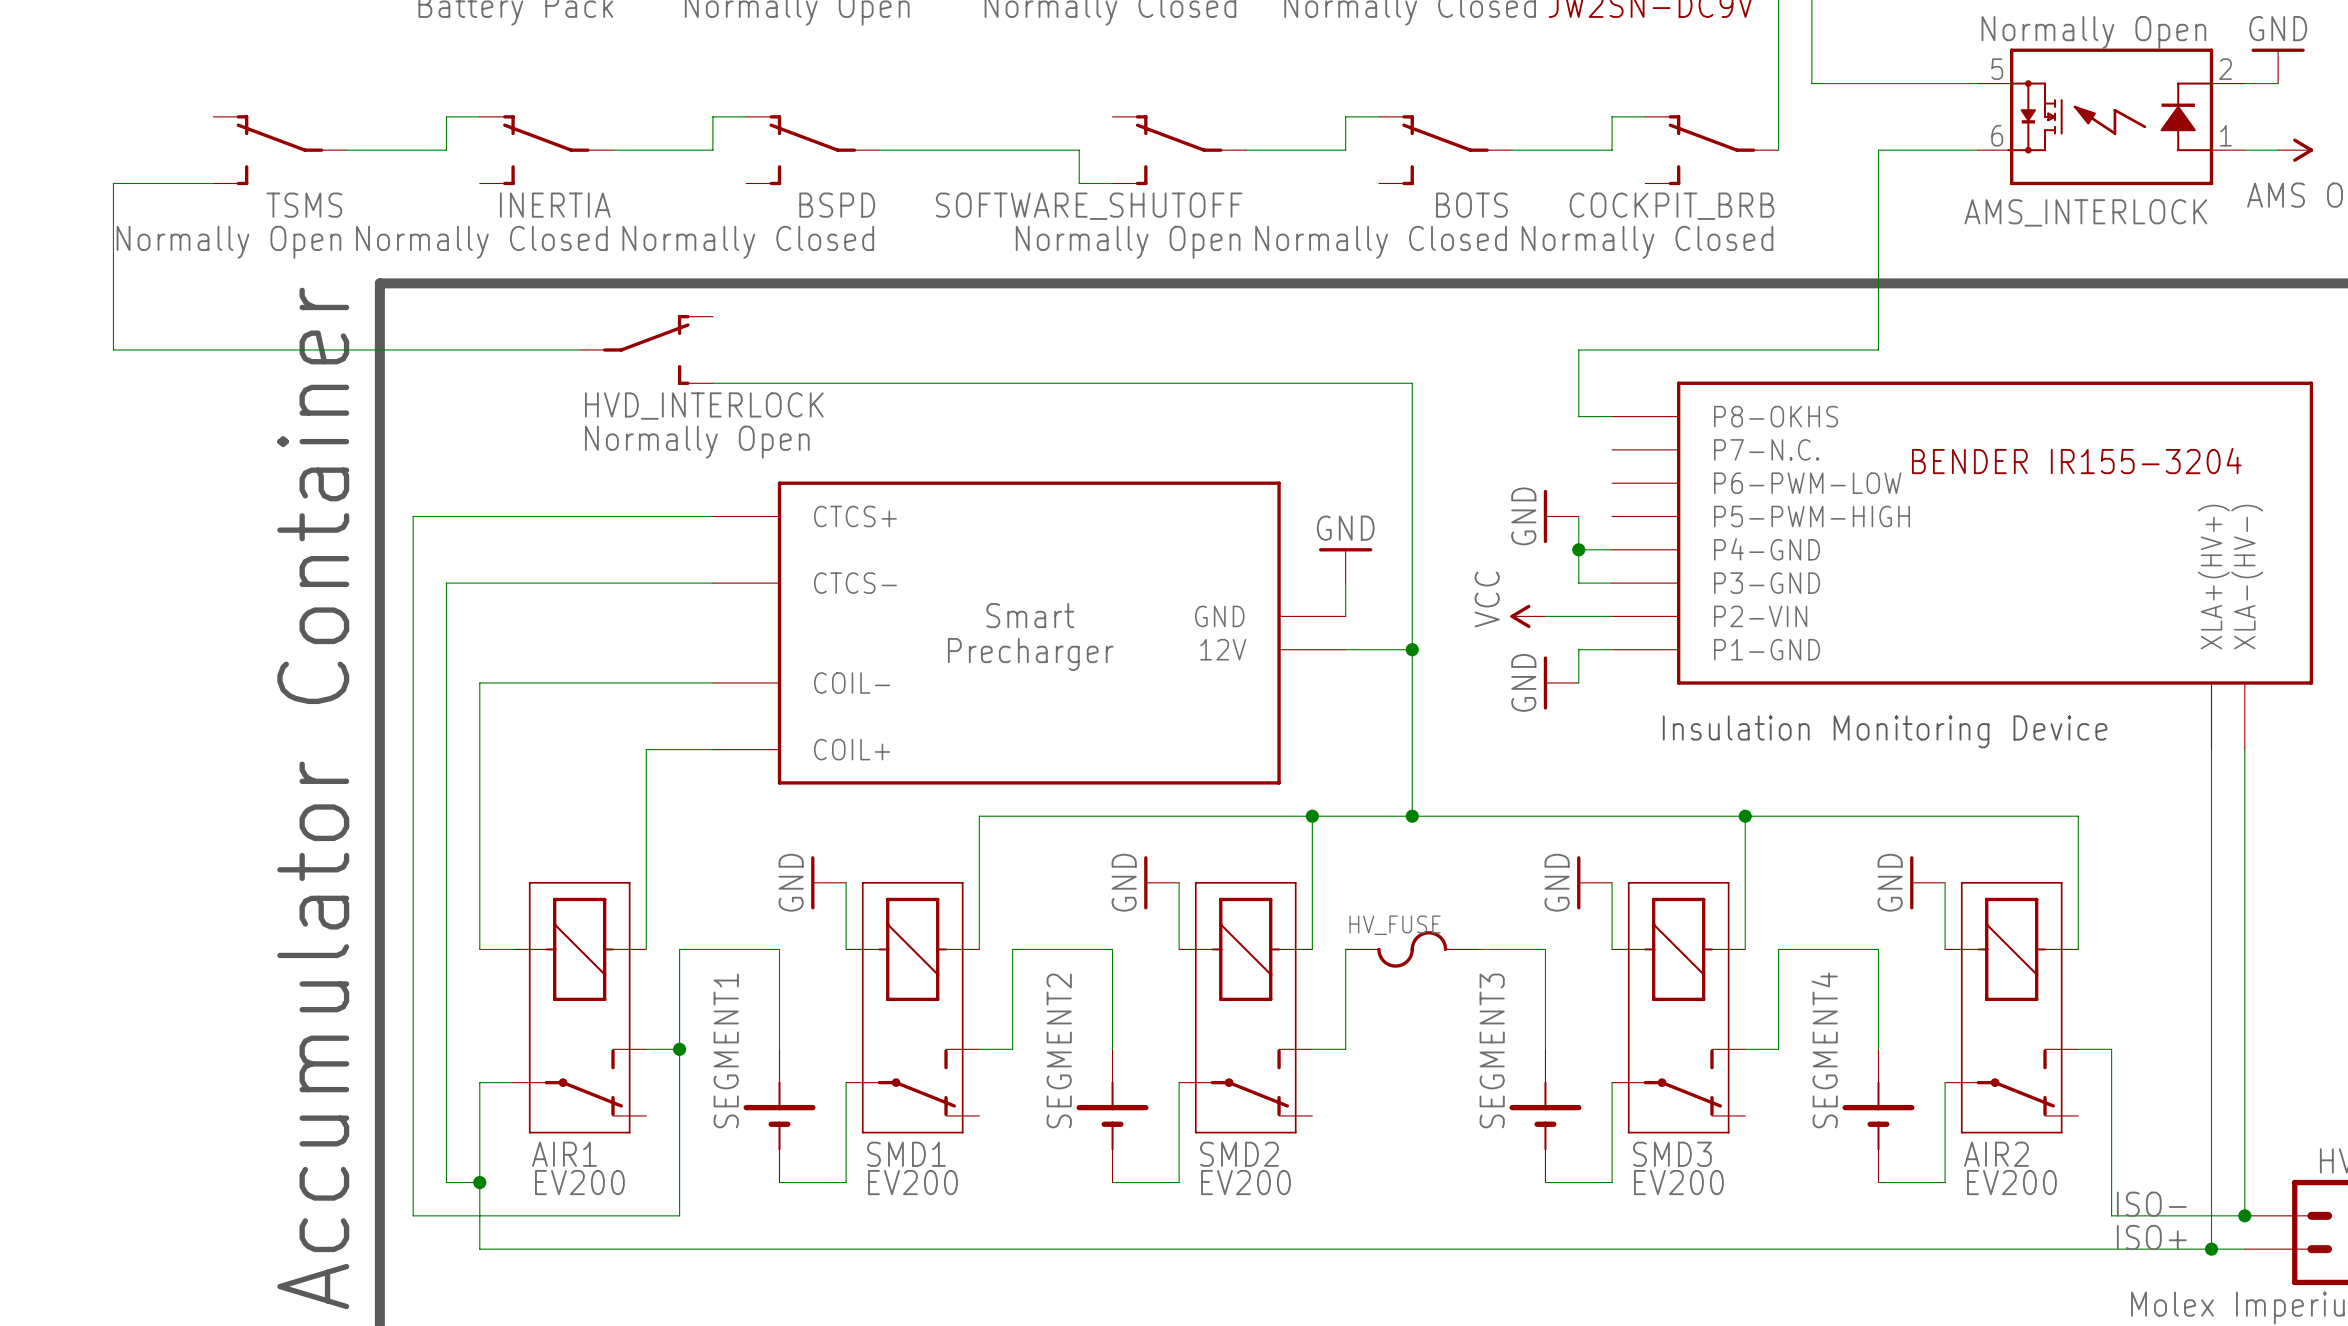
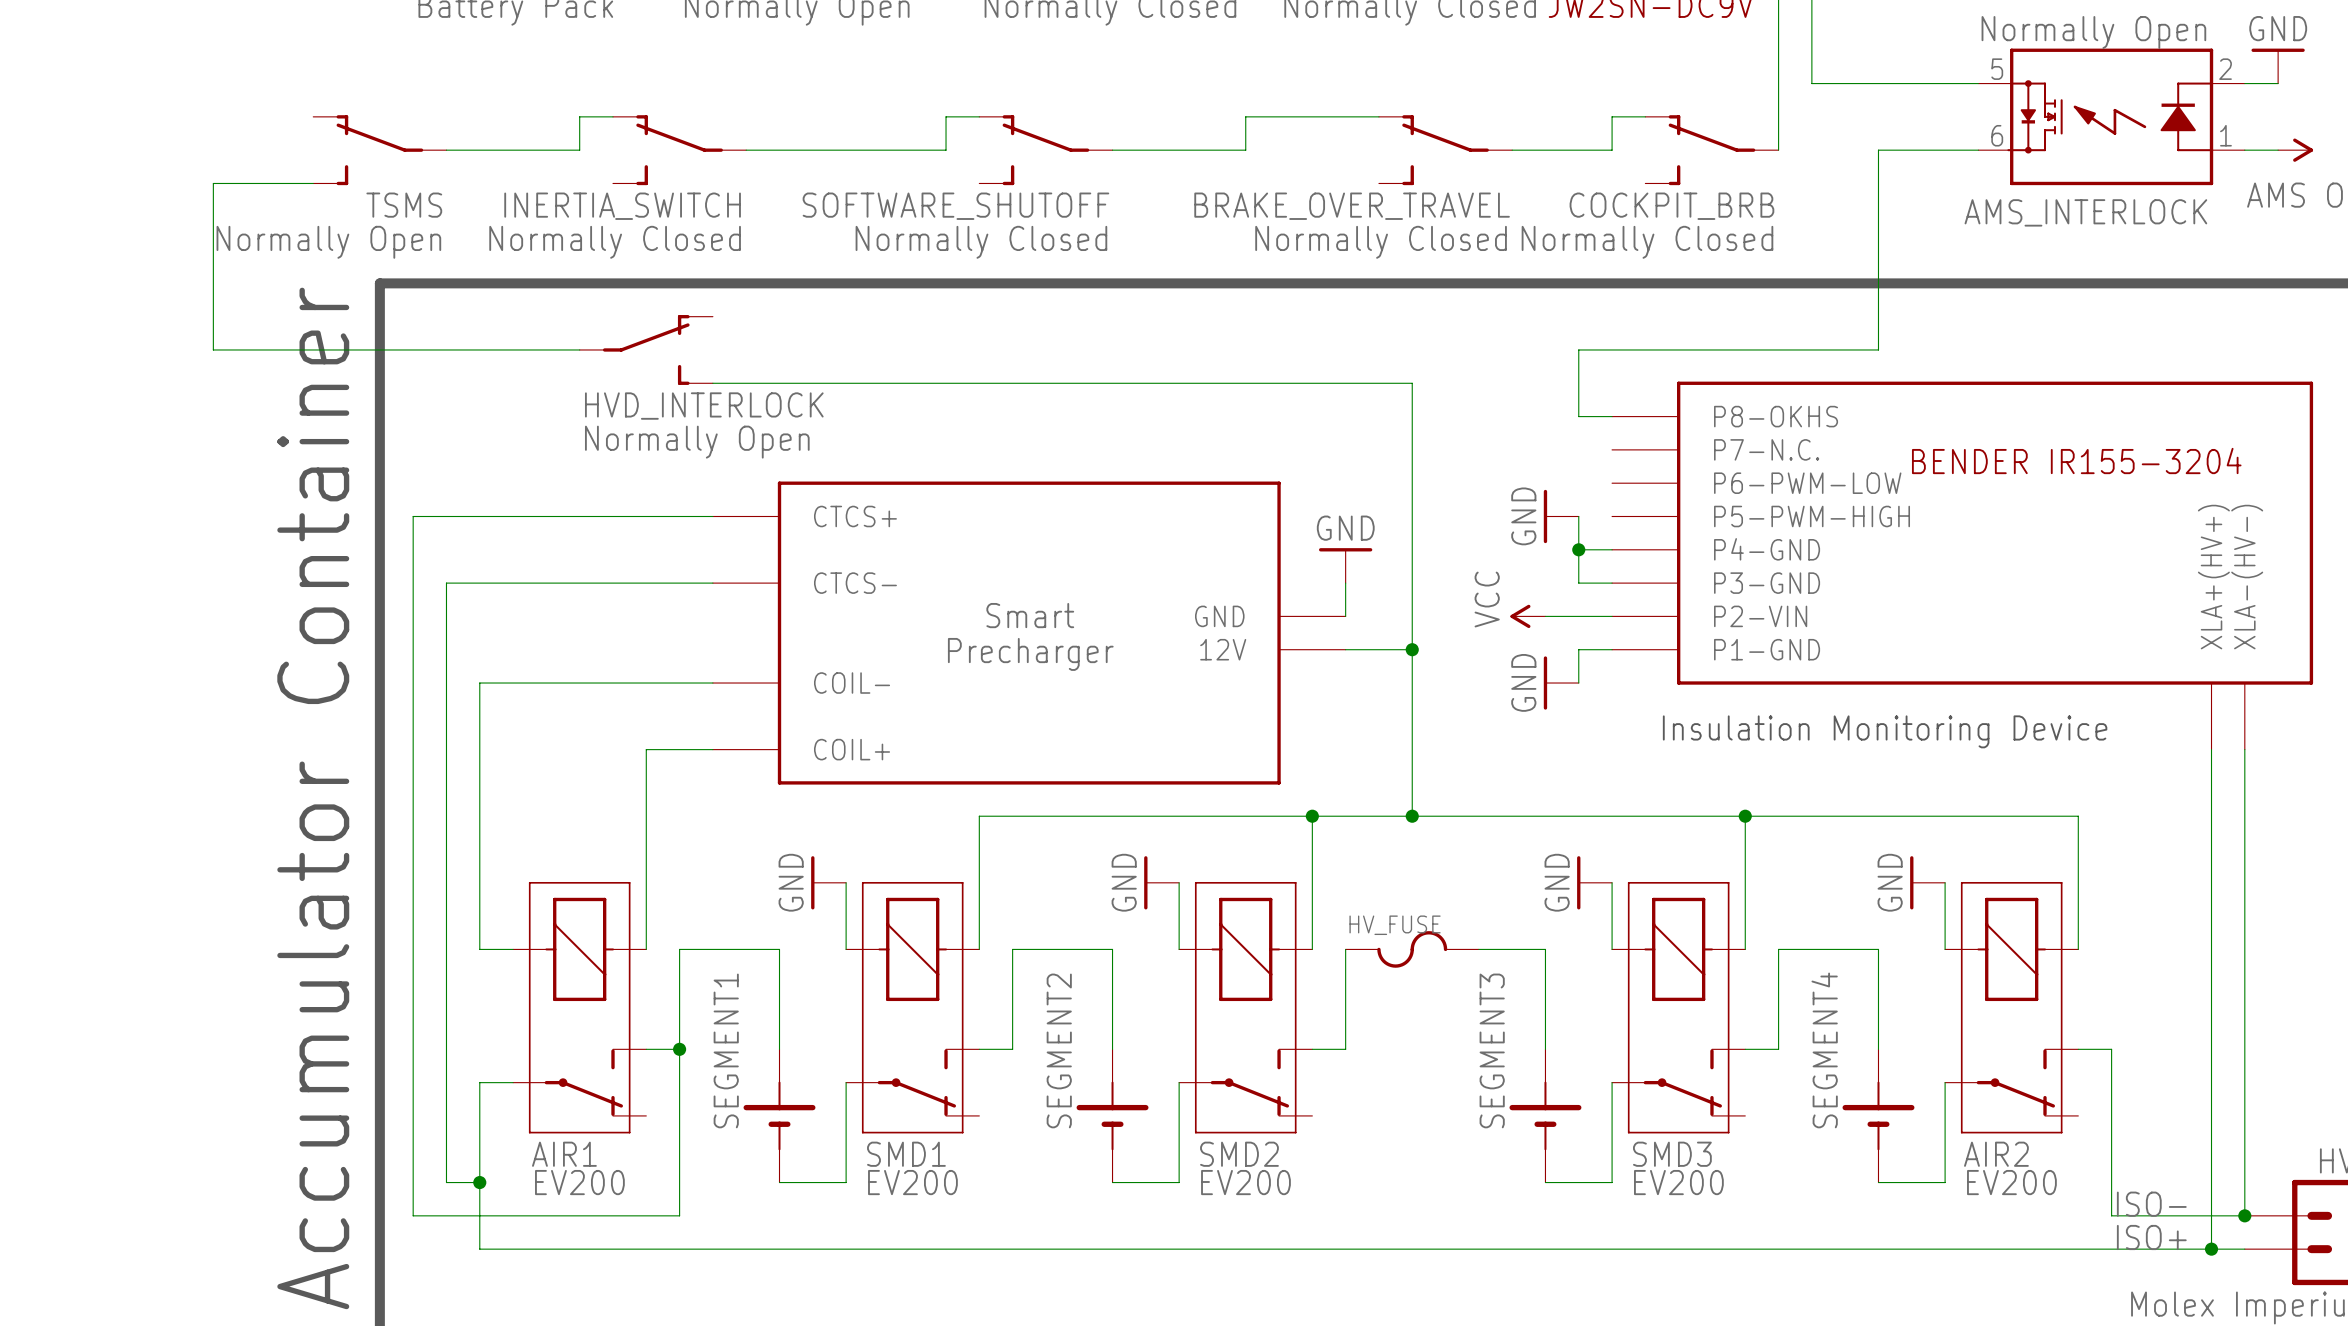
wire: (479, 116) (446, 116) (446, 150) (346, 150) -> none
wire: none -> (612, 116) (579, 116) (579, 150) (446, 150)
wire: (746, 116) (712, 116) (712, 150) (612, 150) -> none
wire: (1345, 116) (1345, 150) (1245, 150) -> (1345, 116) (1245, 116) (1245, 150) (1112, 150)
TSMS position: (279, 150) -> (379, 150)
INERTIA: Normally Closed (546, 150) -> none
INERTIA_SWITCH: none -> Normally Closed (679, 150)
wire: none -> (746, 150) (879, 150)
BSPD: Normally Closed (812, 150) -> none
wire: (946, 150) (1079, 150) (1079, 183) (1112, 183) -> (946, 150) (946, 116) (979, 116)
SOFTWARE_SHUTOFF: none -> Normally Closed (1045, 150)
SOFTWARE_SHUTOFF: Normally Open (1179, 150) -> none
wire: (213, 183) (113, 183) (113, 349) (213, 349) -> (313, 183) (213, 183) (213, 349)
BOTS name: BOTS (1471, 205) -> BRAKE_OVER_TRAVEL (1352, 206)

